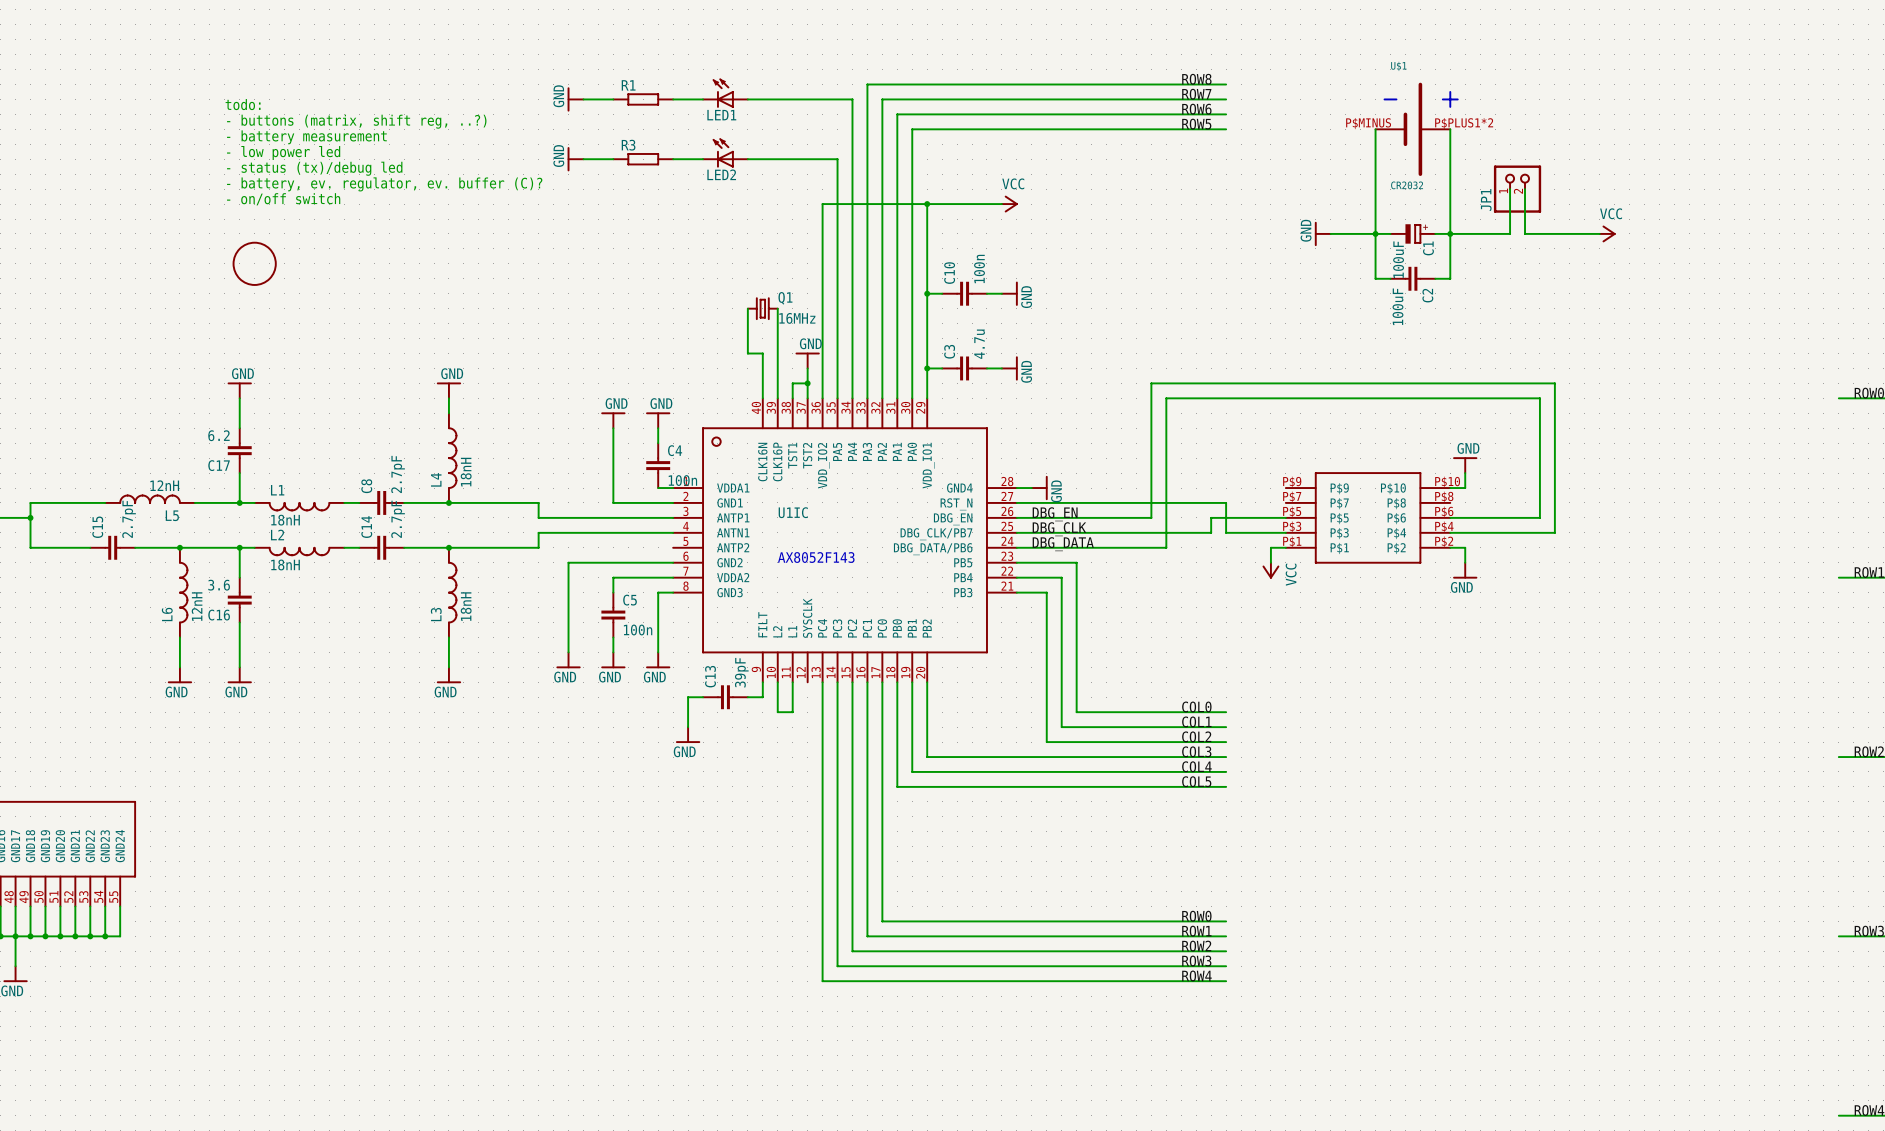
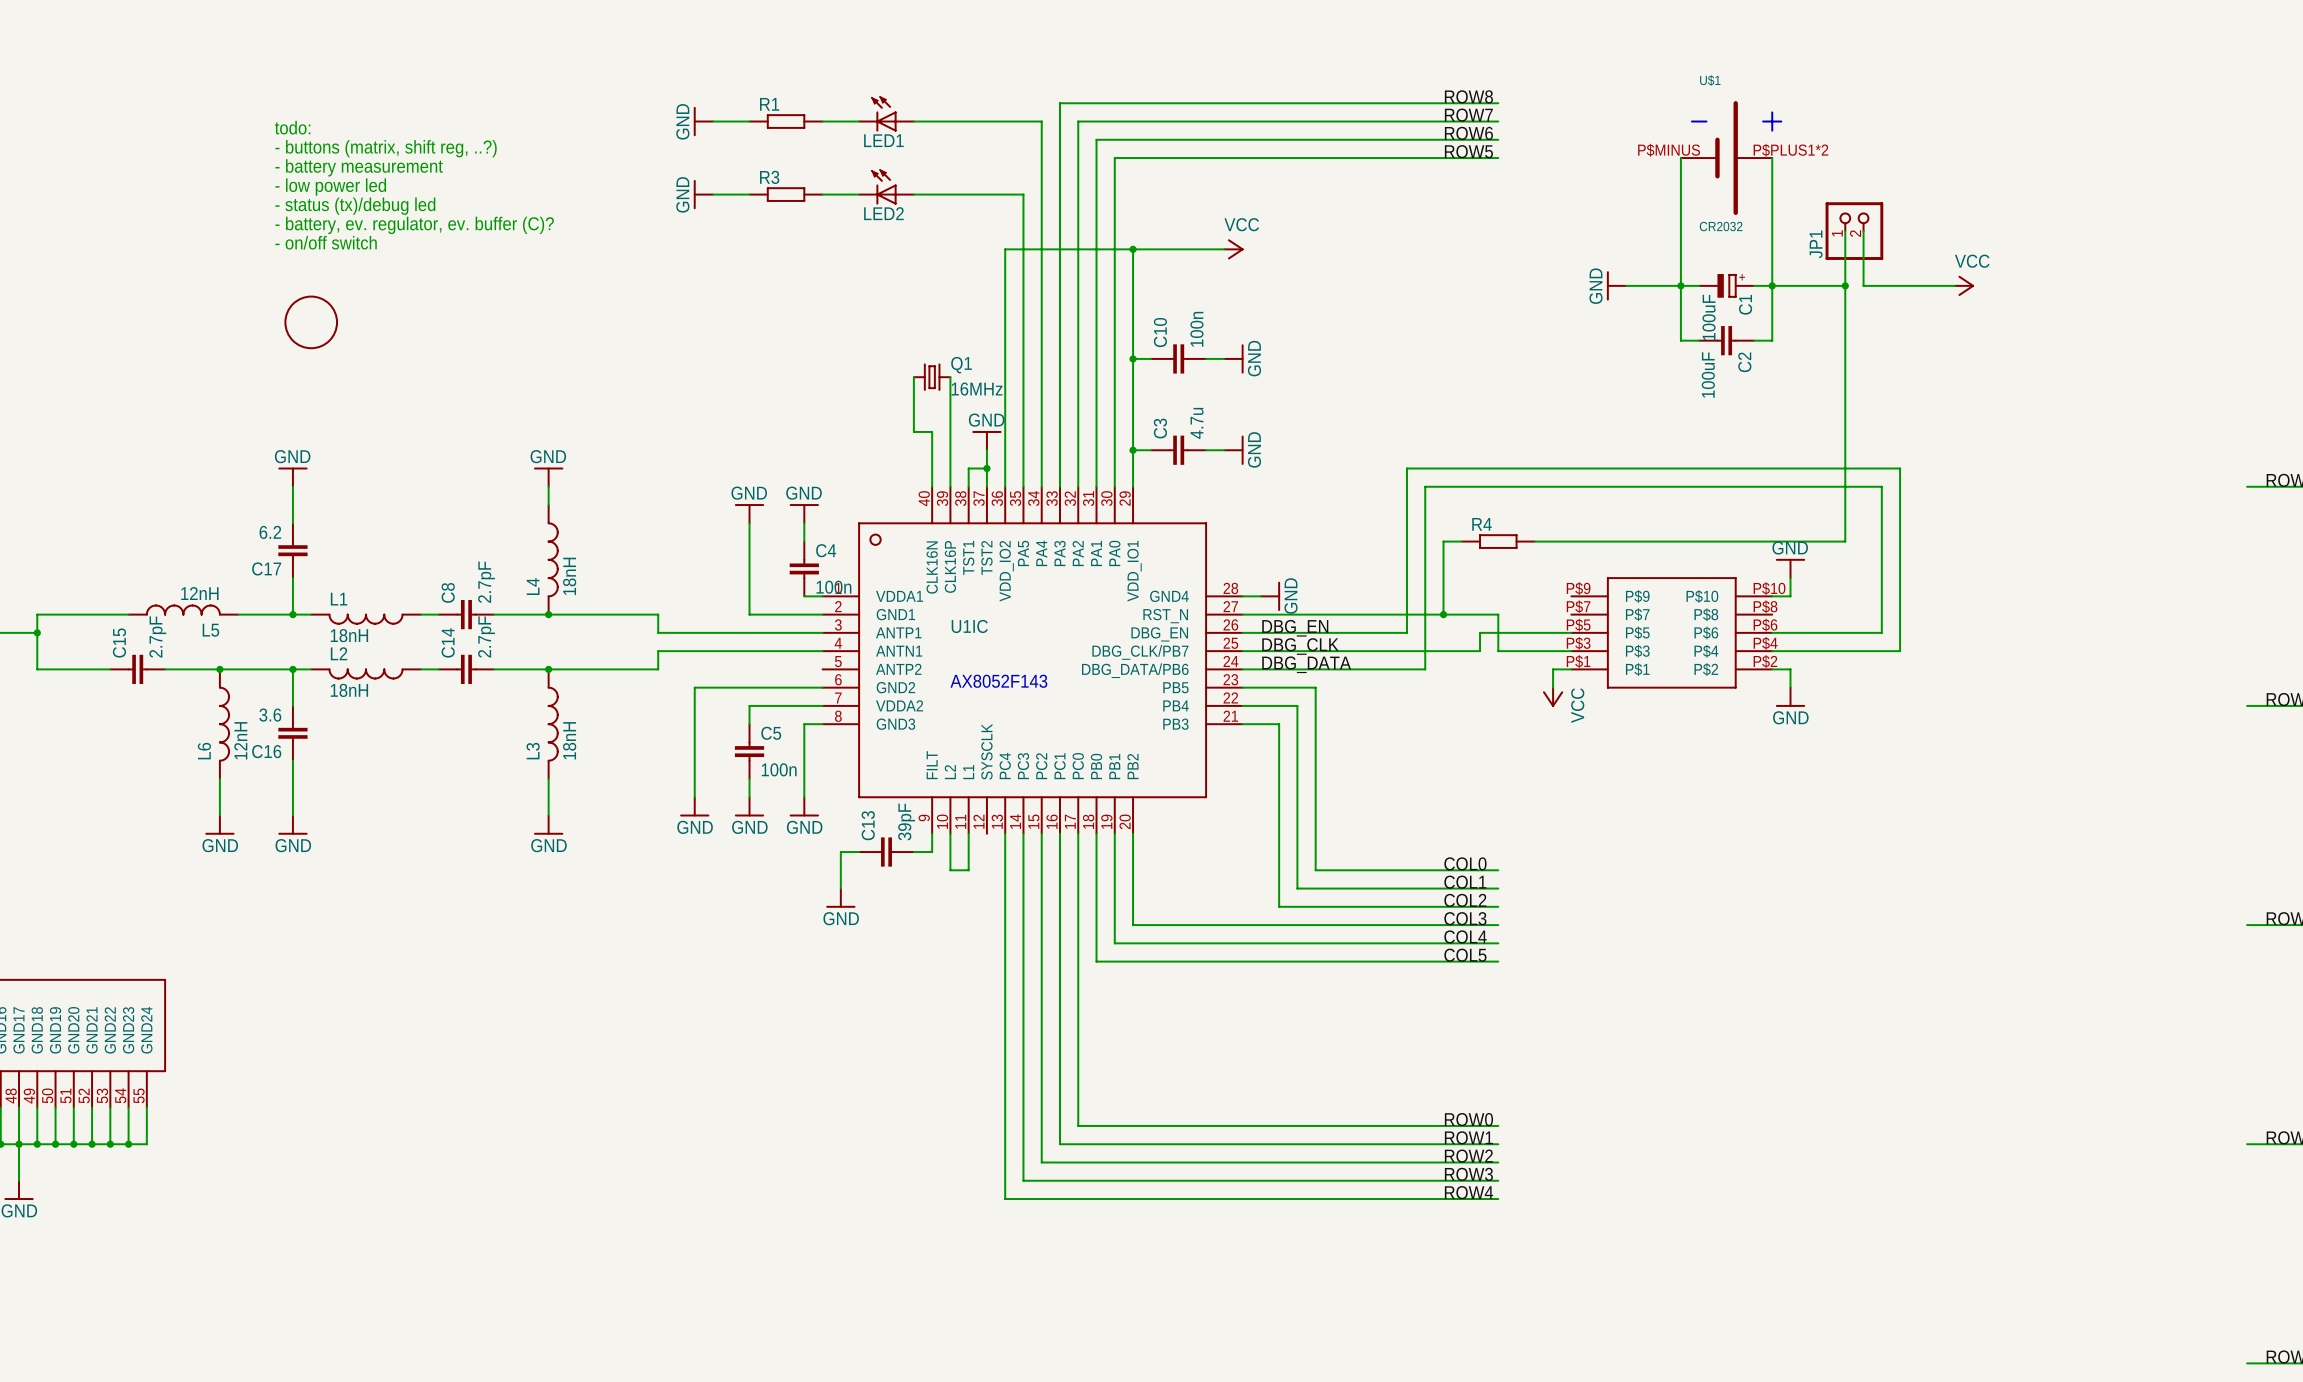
wire: none -> (1845, 285) (1845, 541) (1534, 541)
junction: none -> (1845, 285)
wire: none -> (1461, 541) (1443, 541) (1443, 614)
R4: none -> (1498, 541)
junction: none -> (1443, 614)

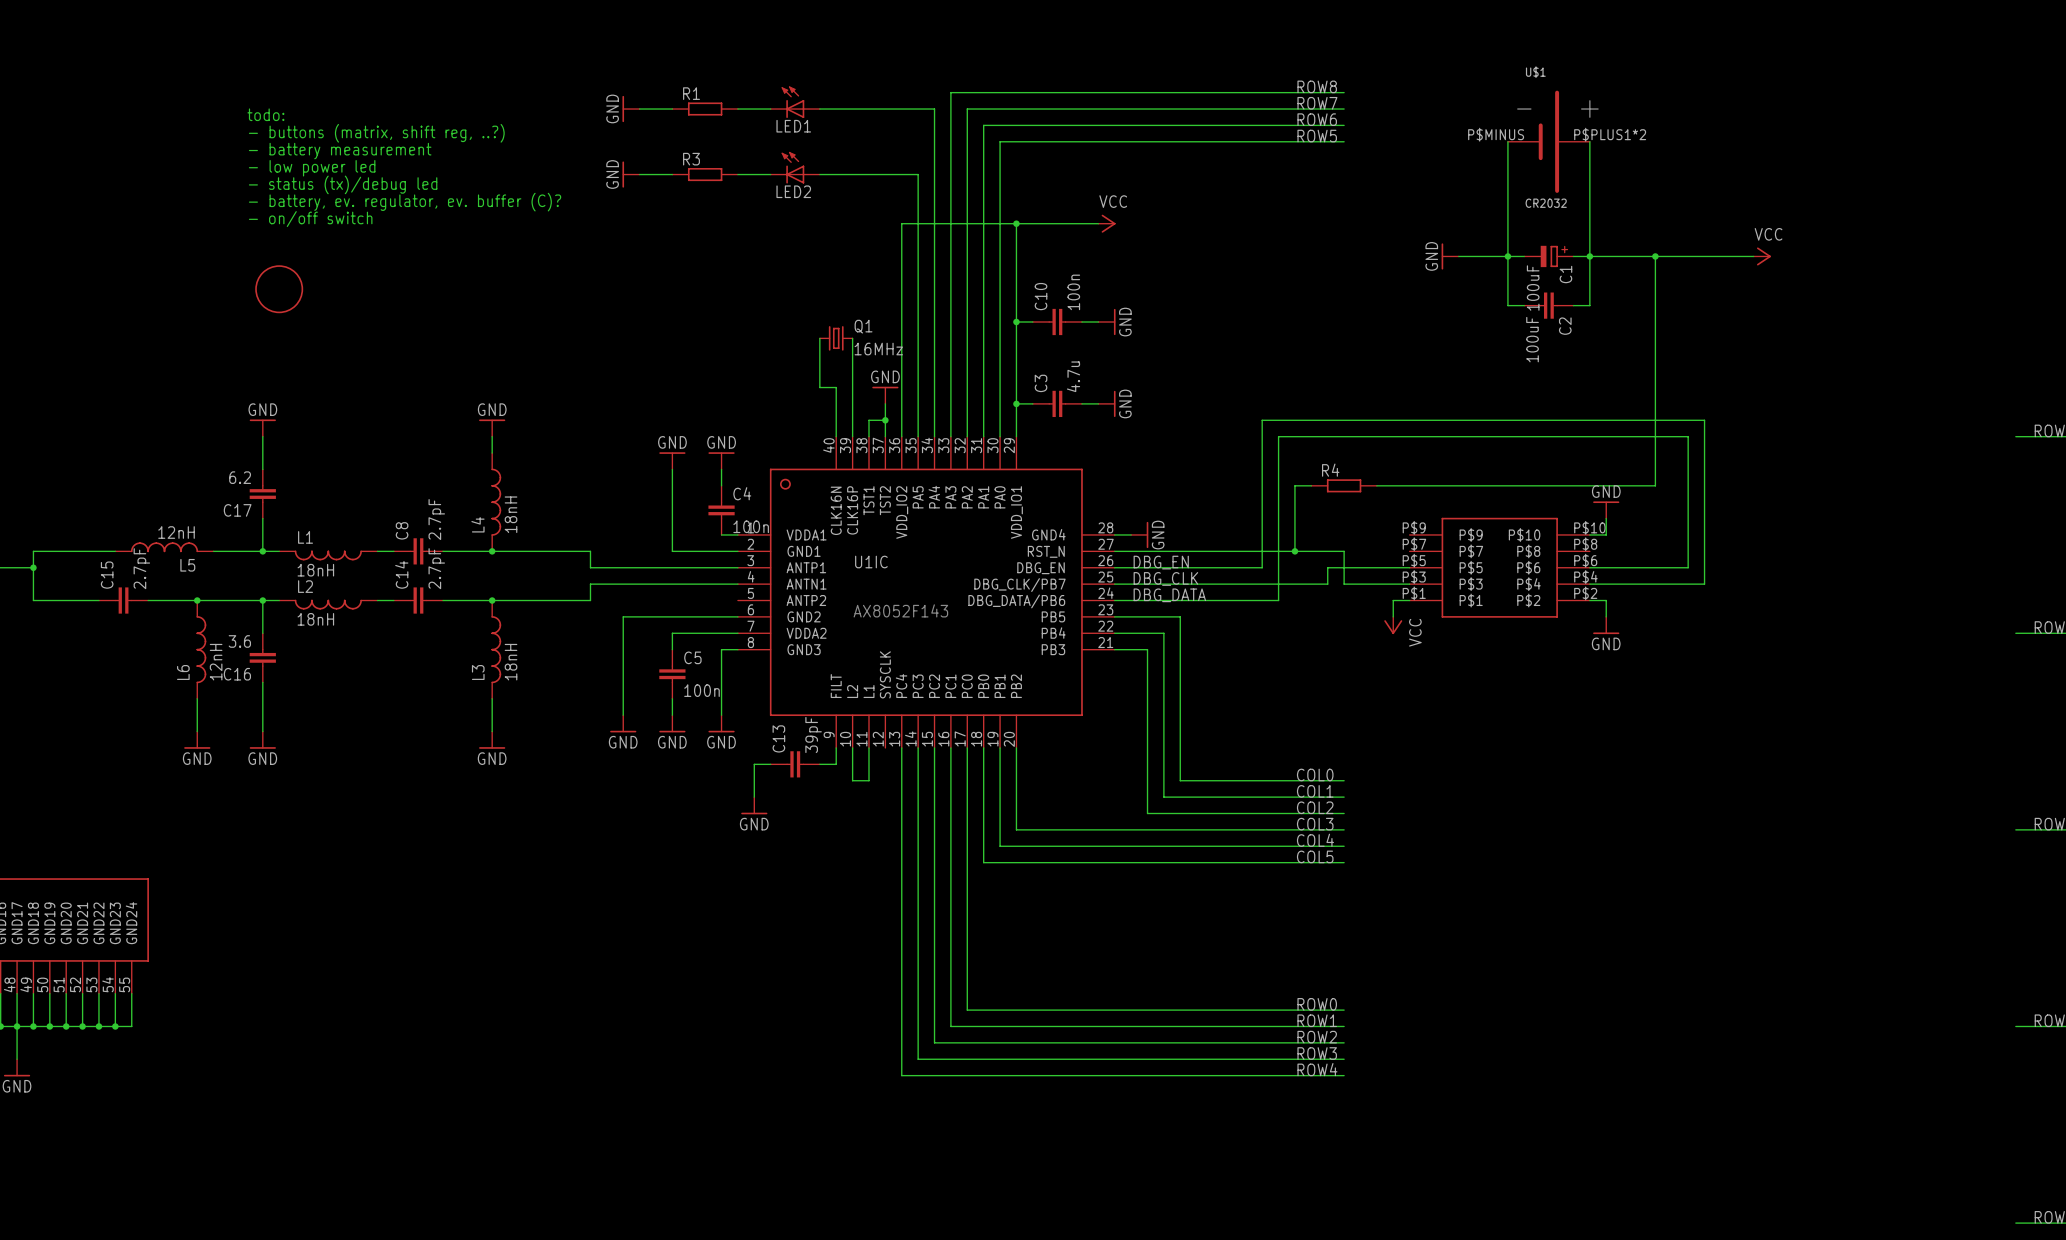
wire: (1845, 231) (1845, 285) -> (1671, 256) (1655, 256)
JP1: (1854, 231) -> none
wire: (1863, 231) (1863, 285) -> none

